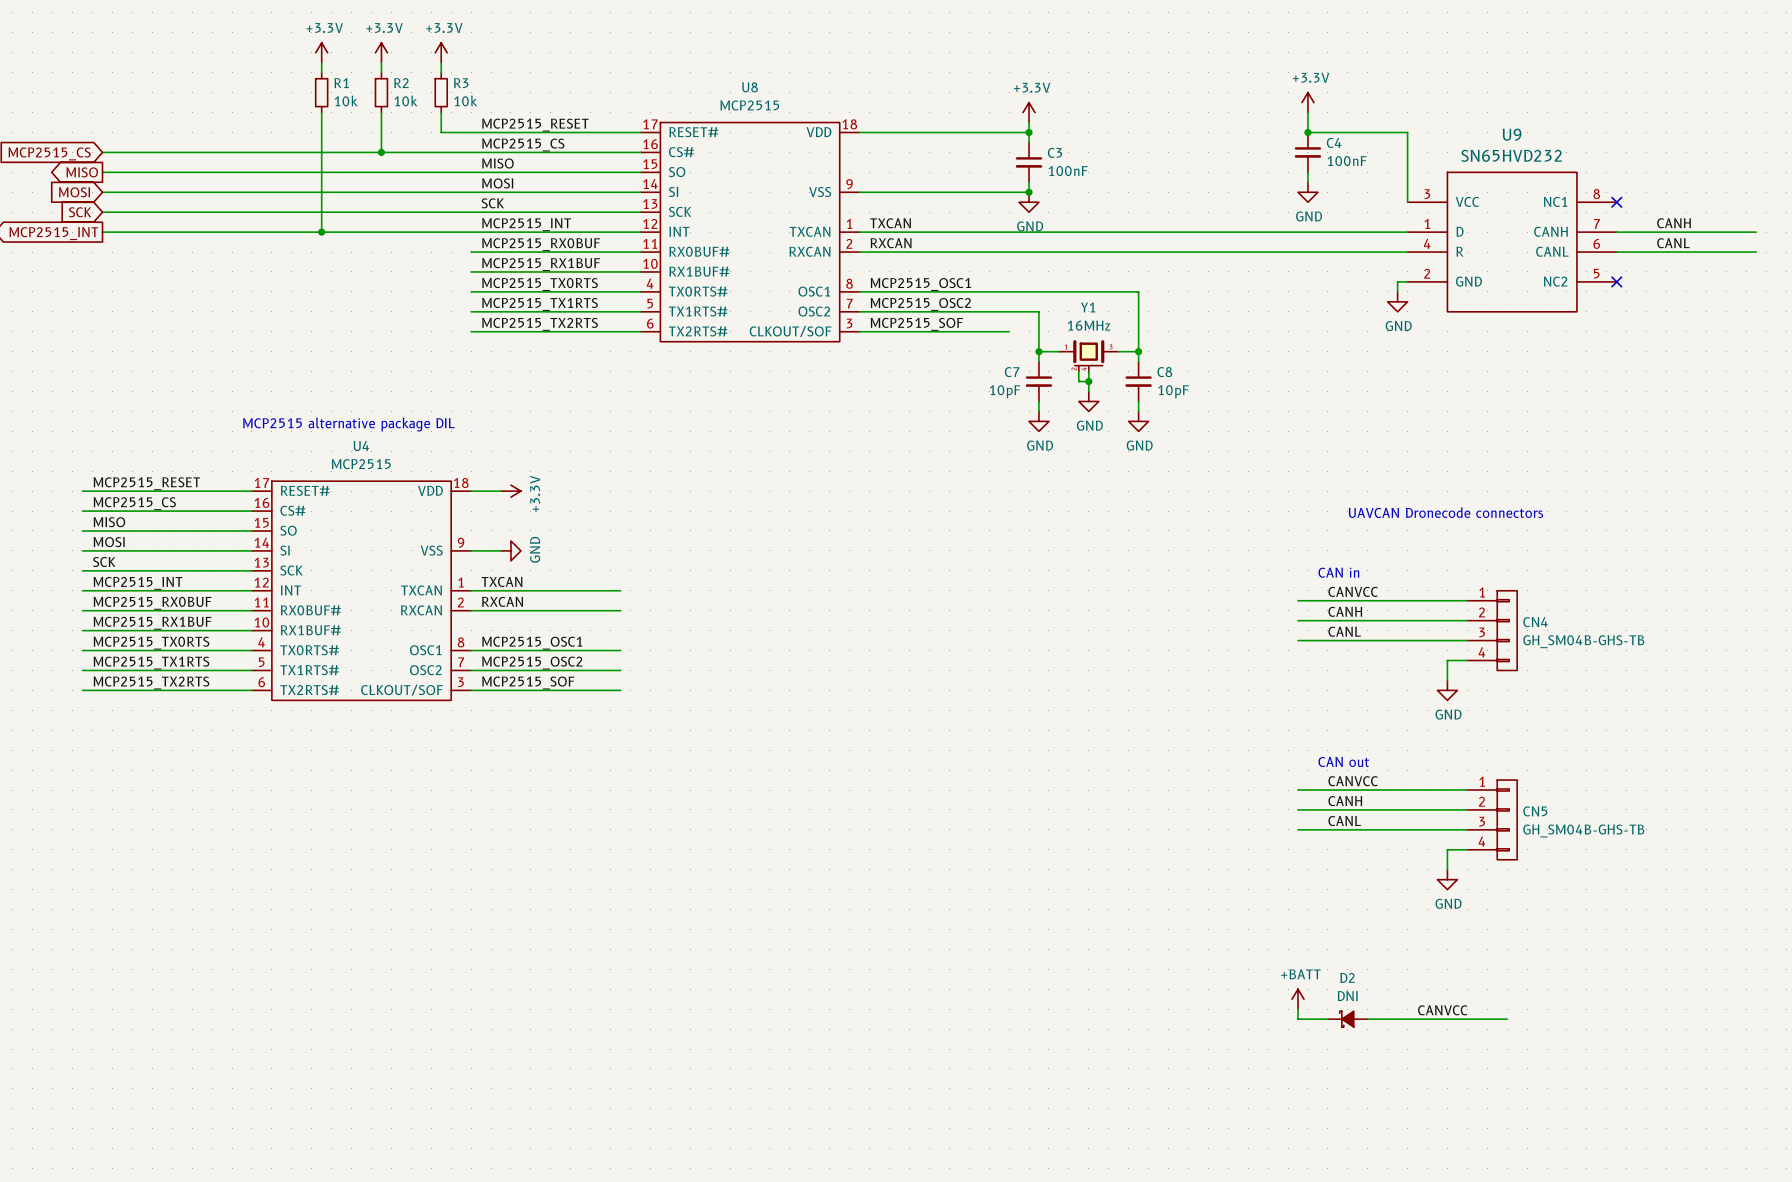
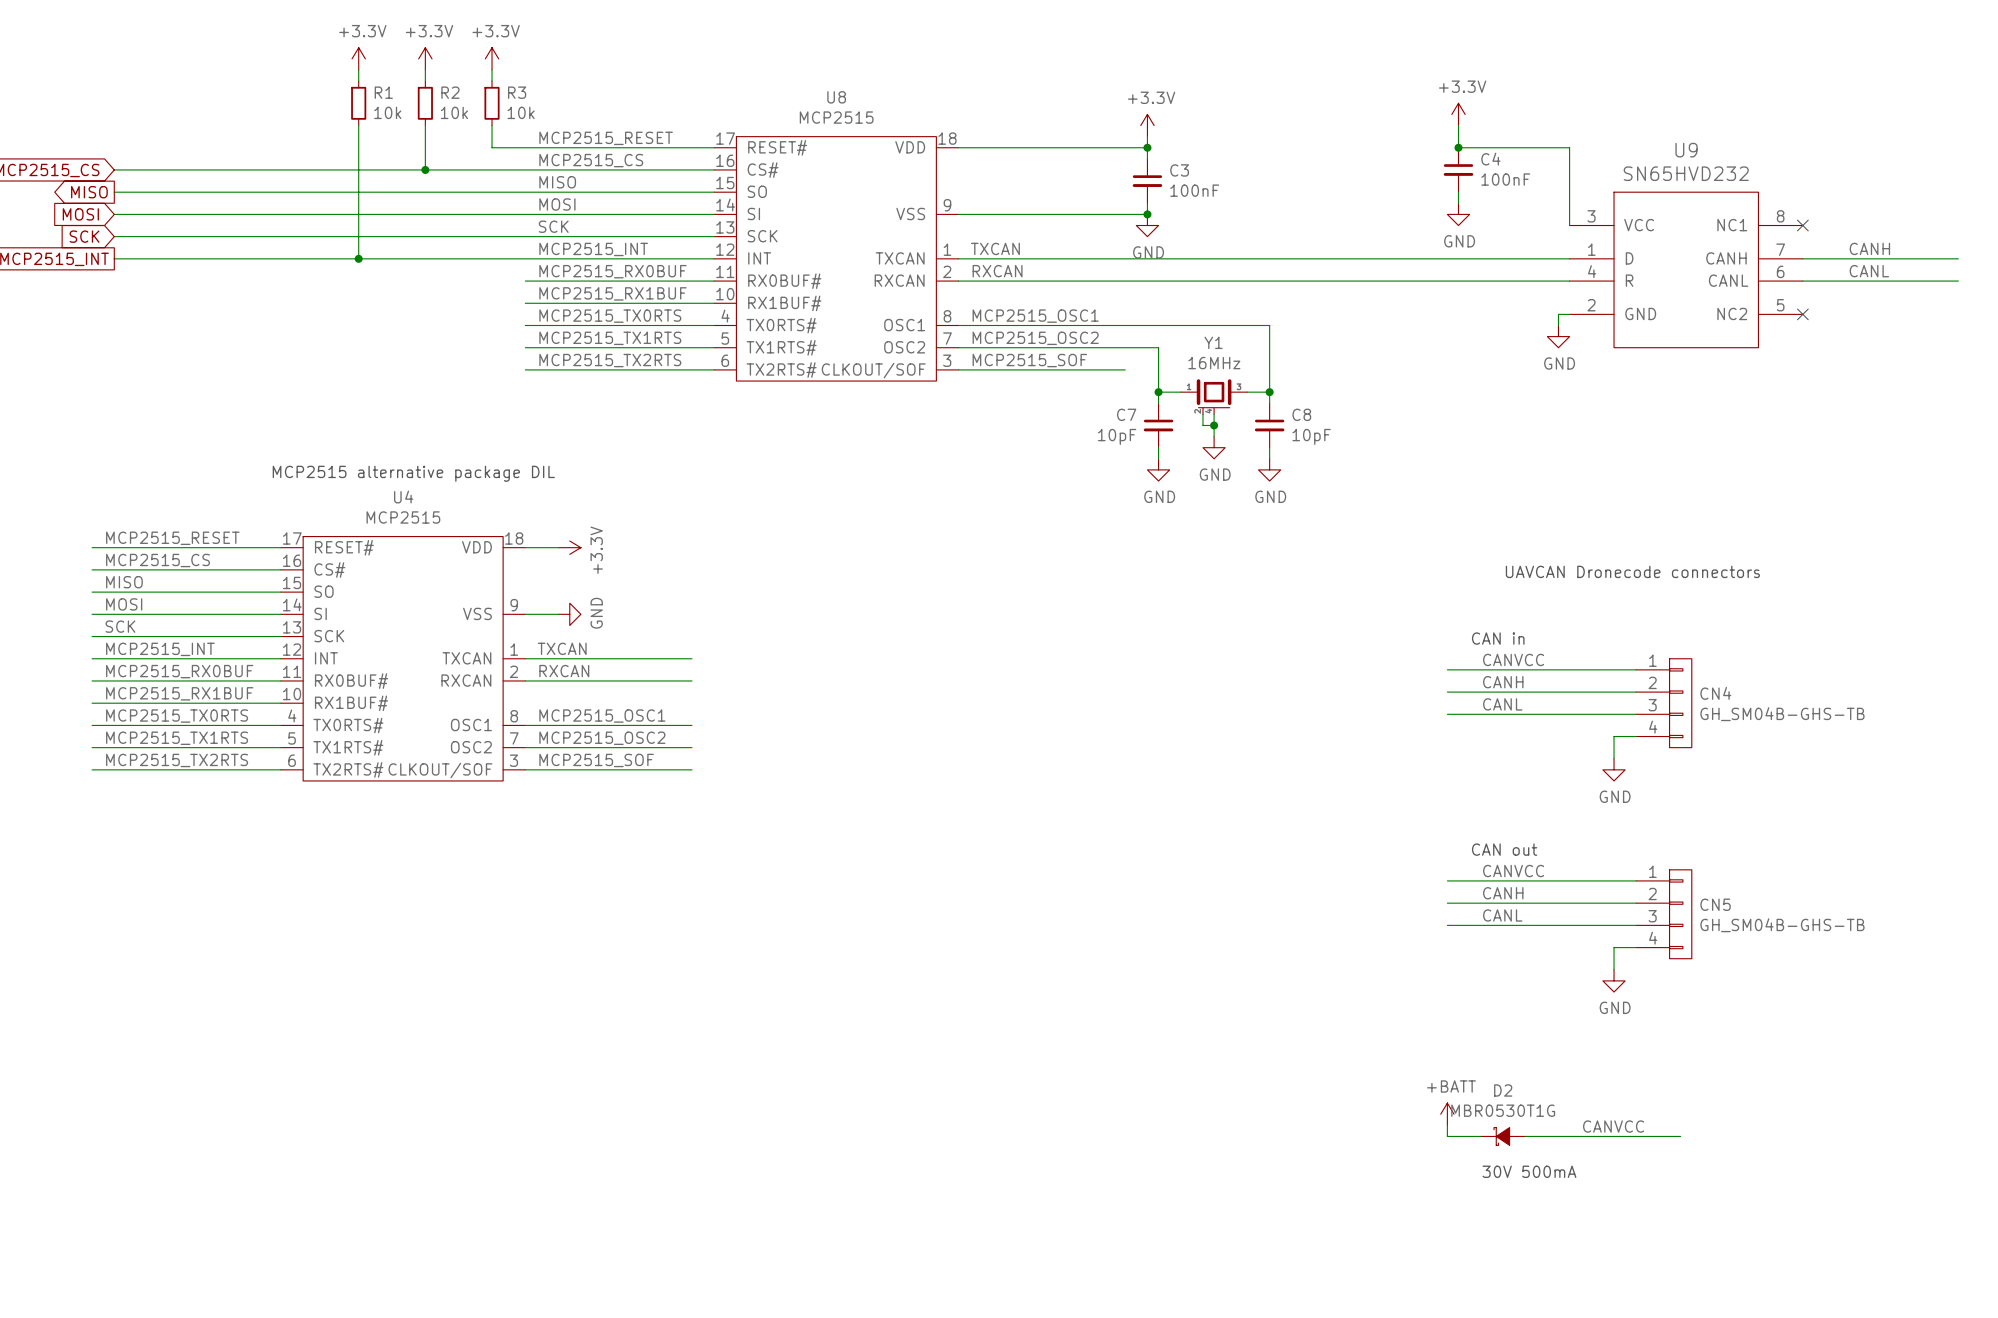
D2 value: DNI (1347, 996) -> MBR0530T1G (1503, 1110)
text: none -> 30V 500mA (1529, 1171)

